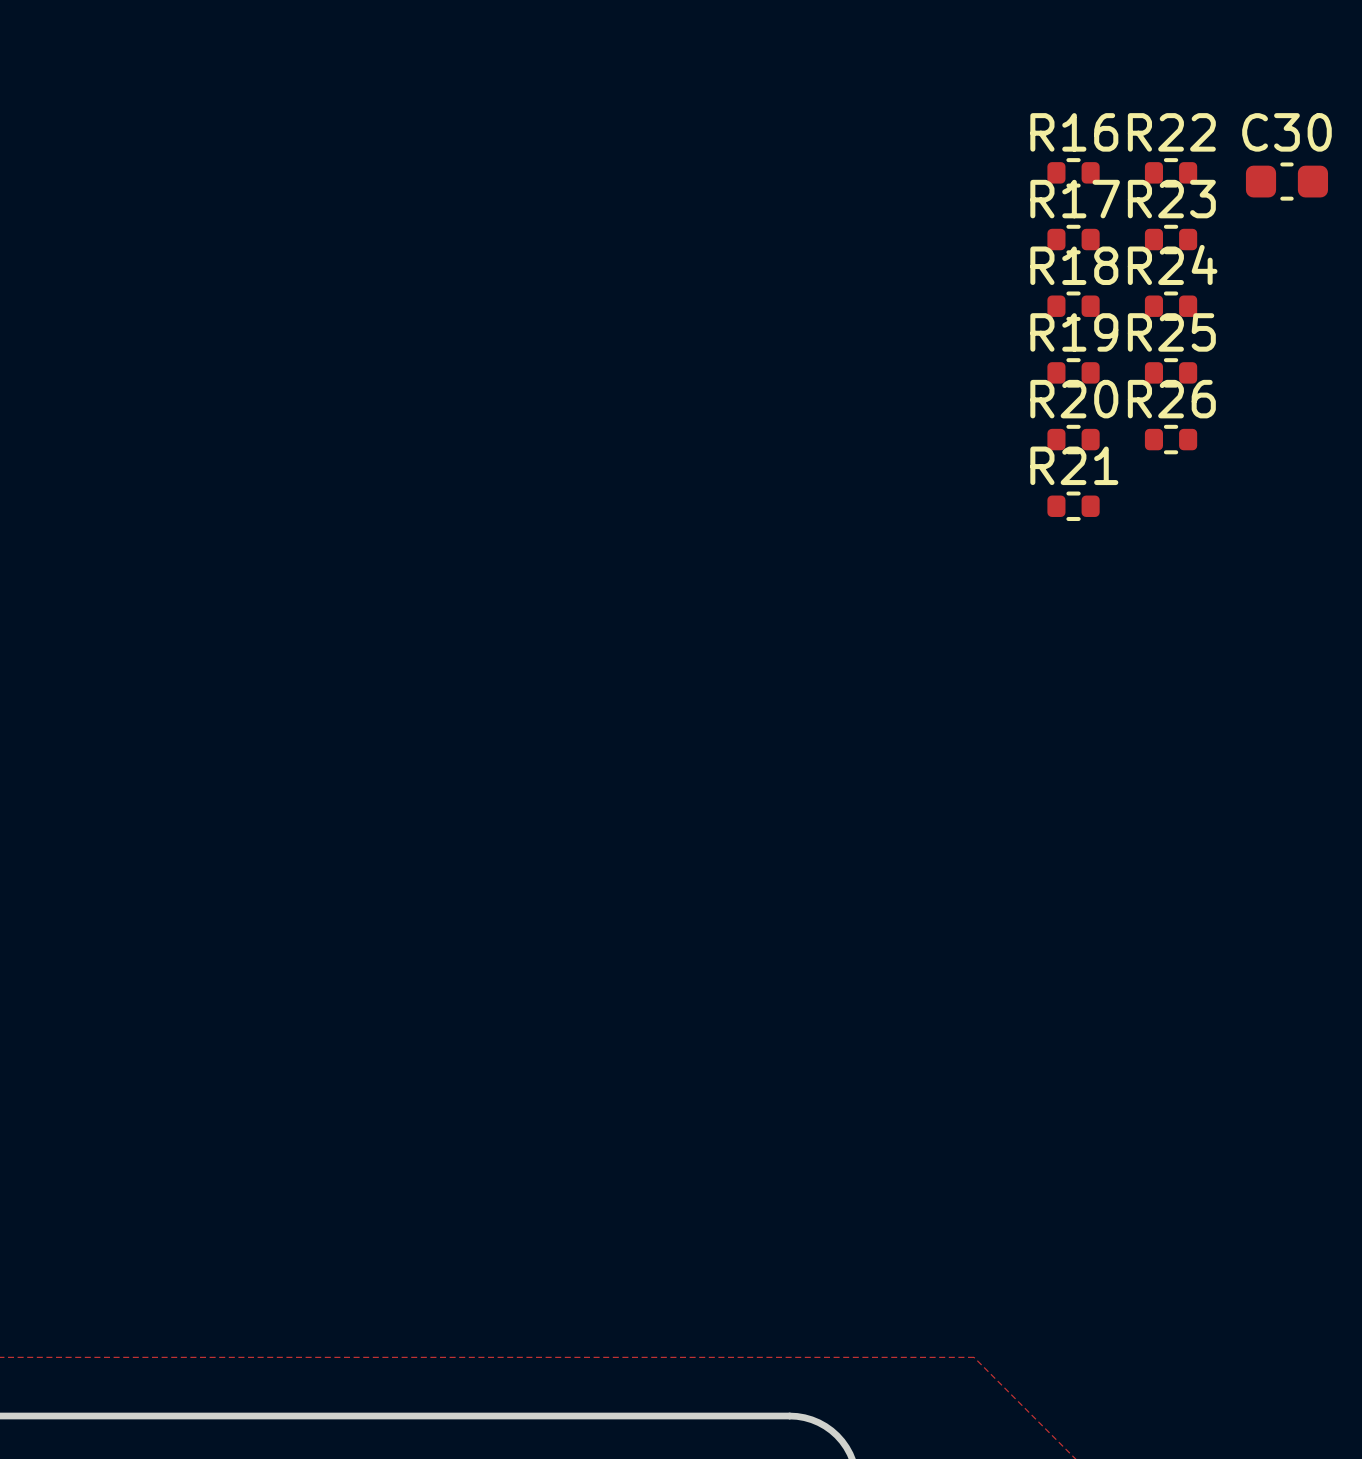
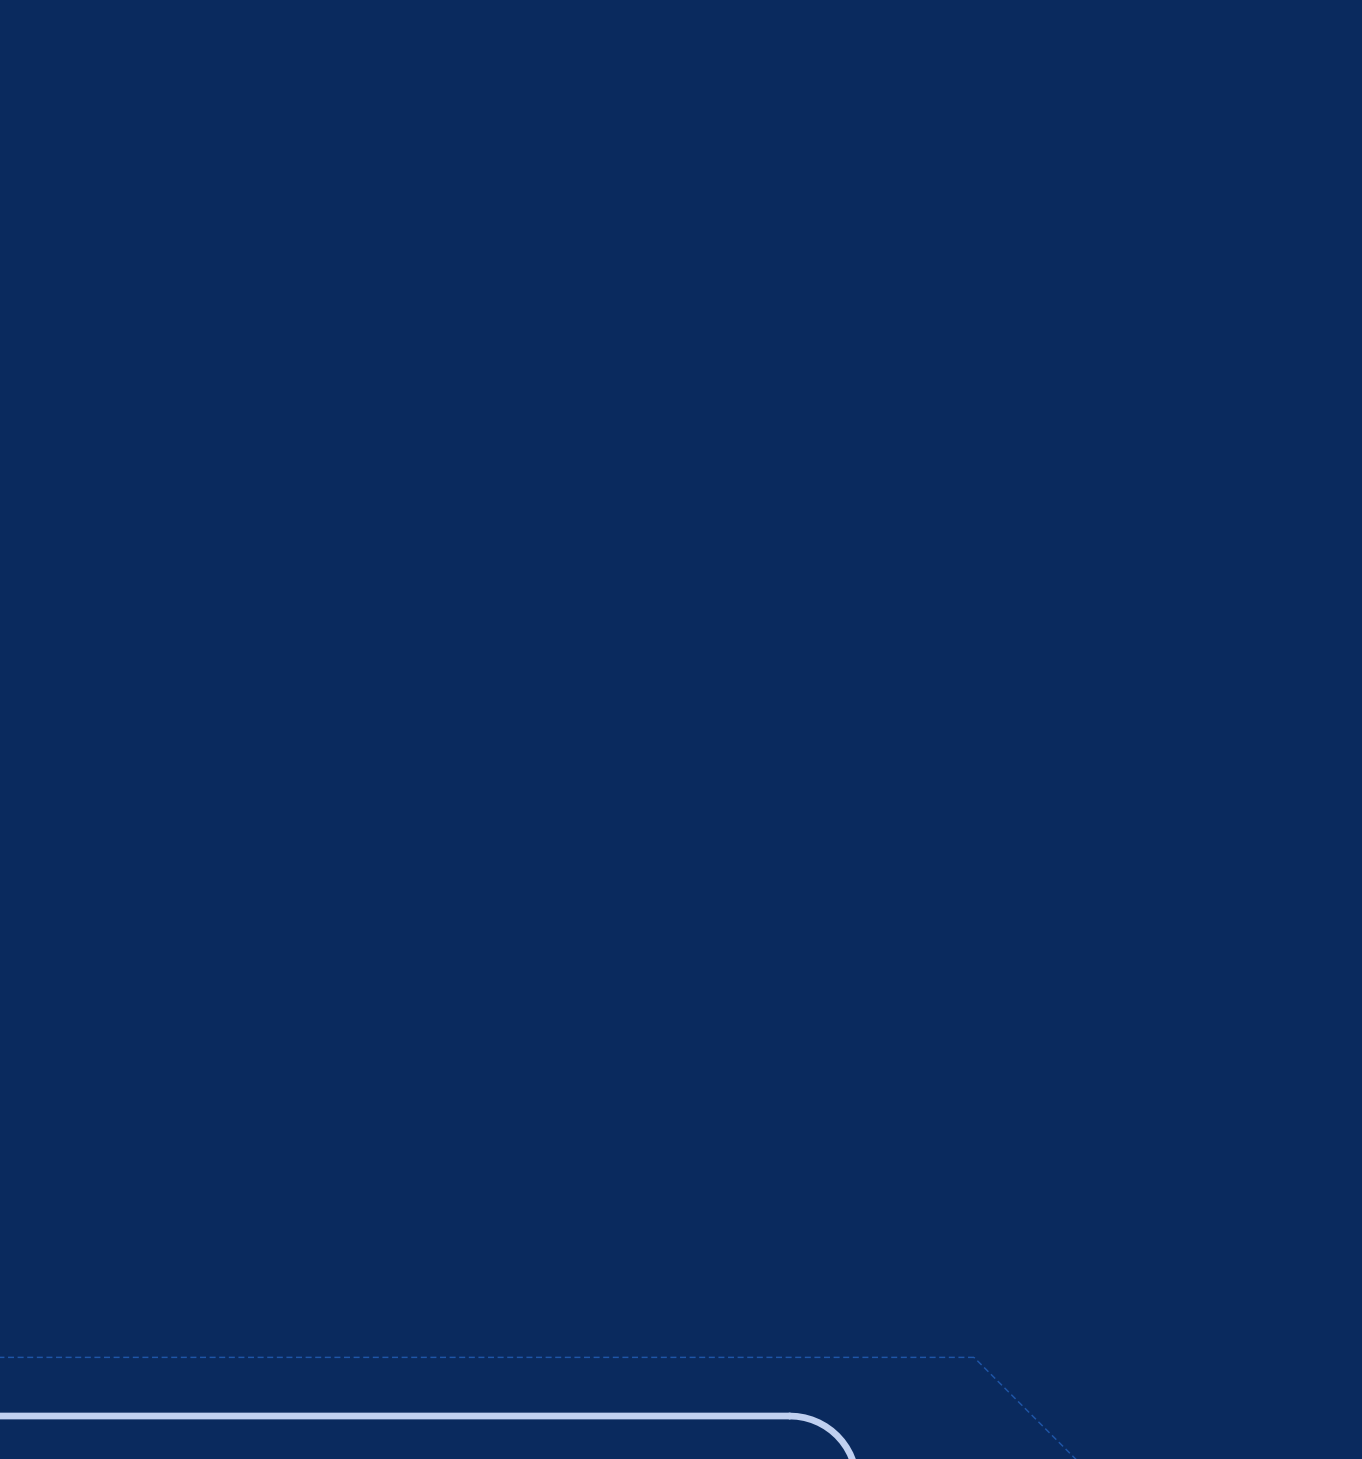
R16: (1073, 172) -> none
R22: (1171, 172) -> none
C30: (1286, 181) -> none
R17: (1073, 239) -> none
R23: (1171, 239) -> none
R18: (1073, 306) -> none
R24: (1171, 306) -> none
R19: (1073, 372) -> none
R25: (1171, 372) -> none
R20: (1073, 439) -> none
R26: (1171, 439) -> none
R21: (1073, 506) -> none

